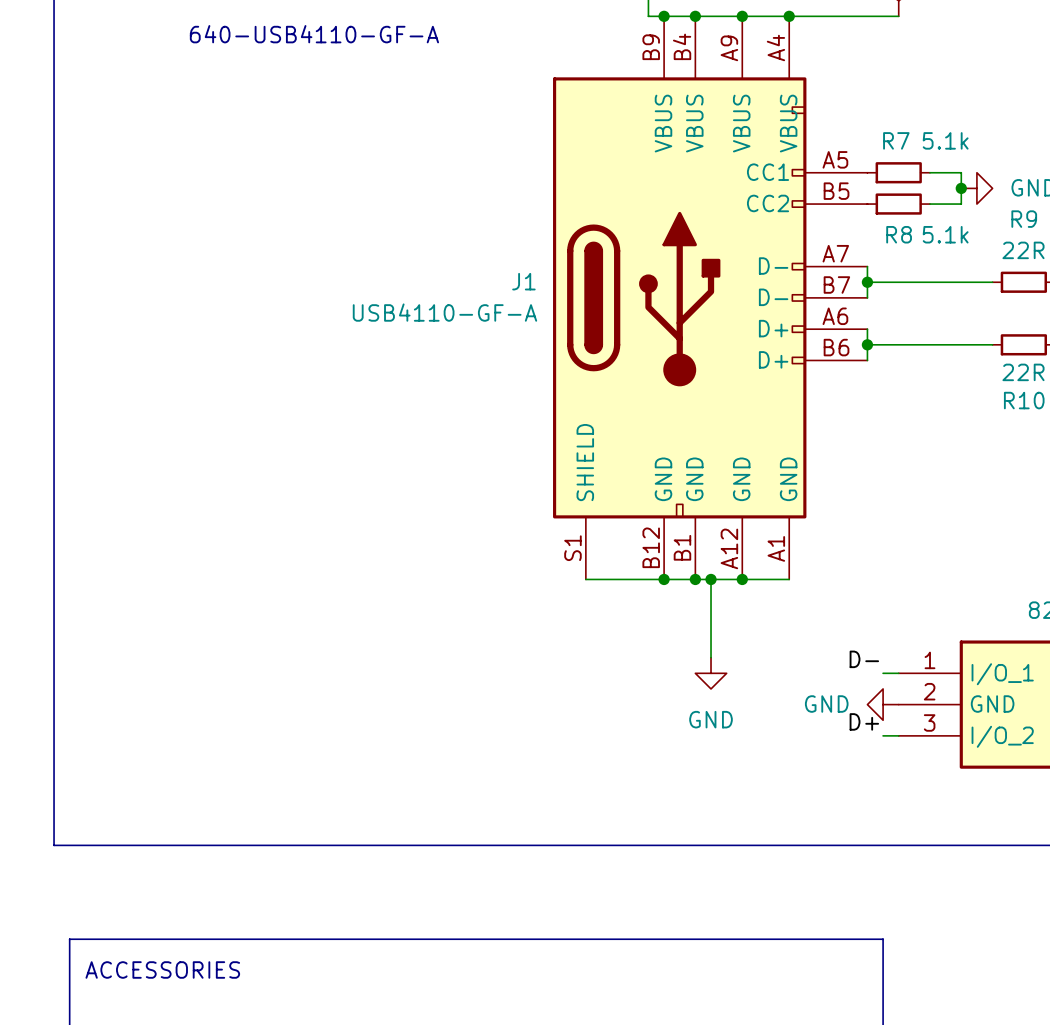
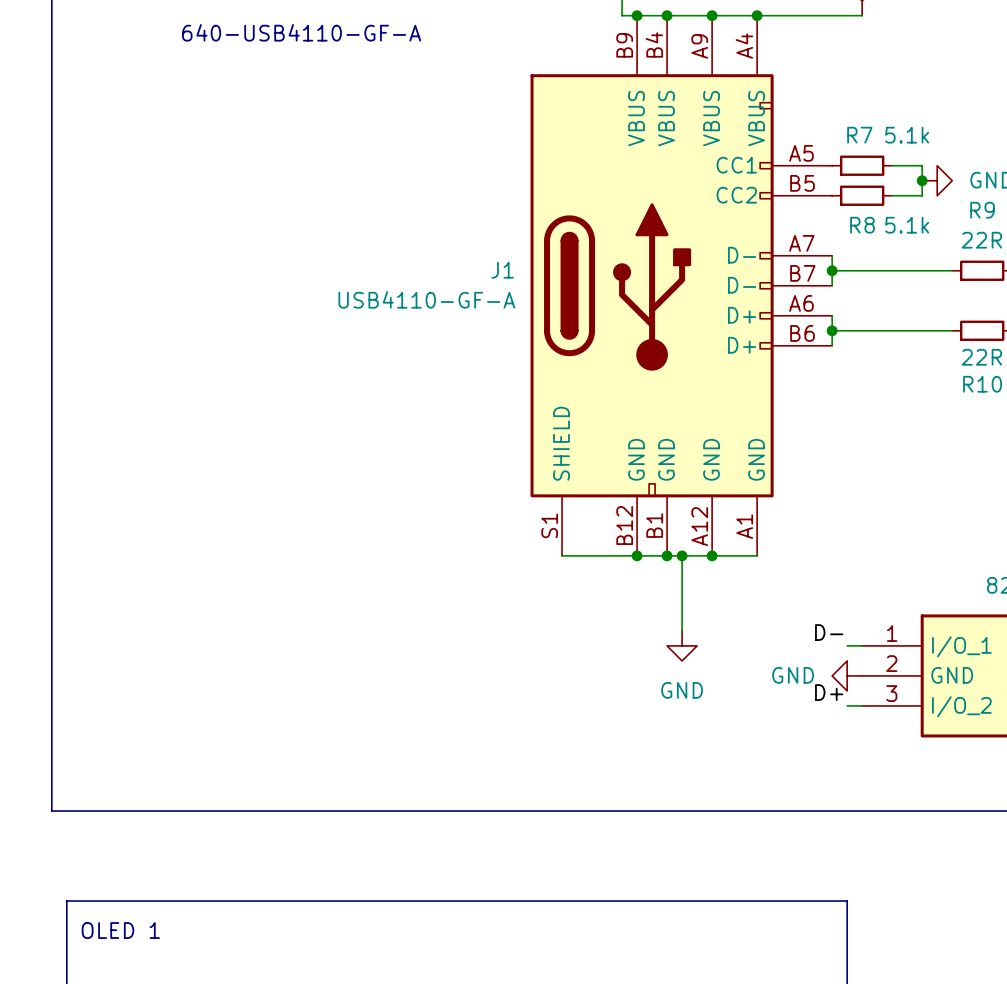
text: none -> OLED 1 (120, 930)
text: ACCESSORIES (162, 969) -> none

